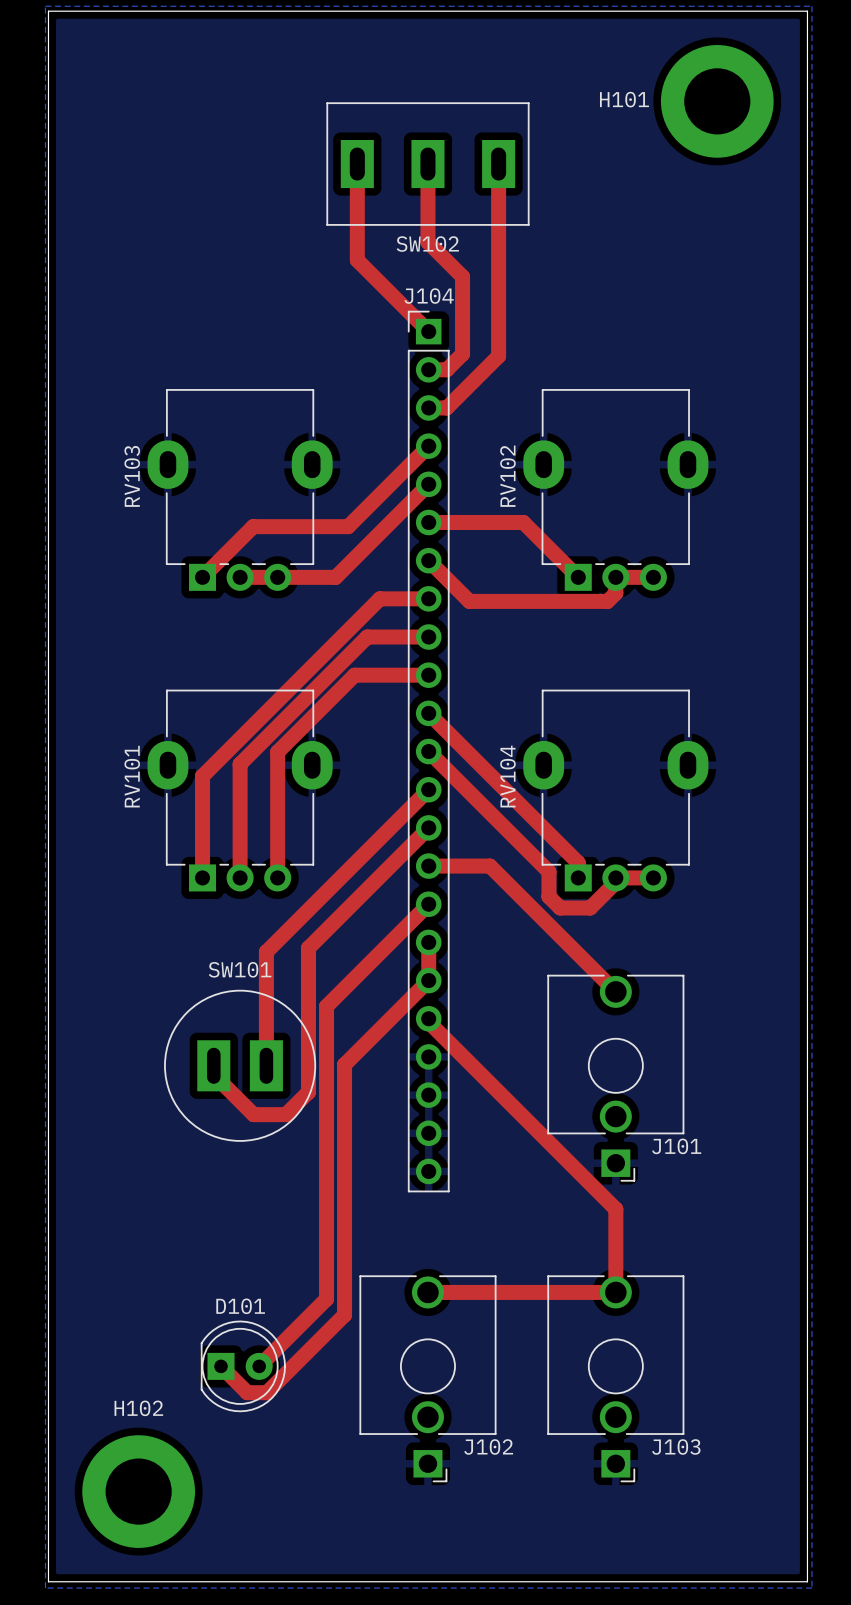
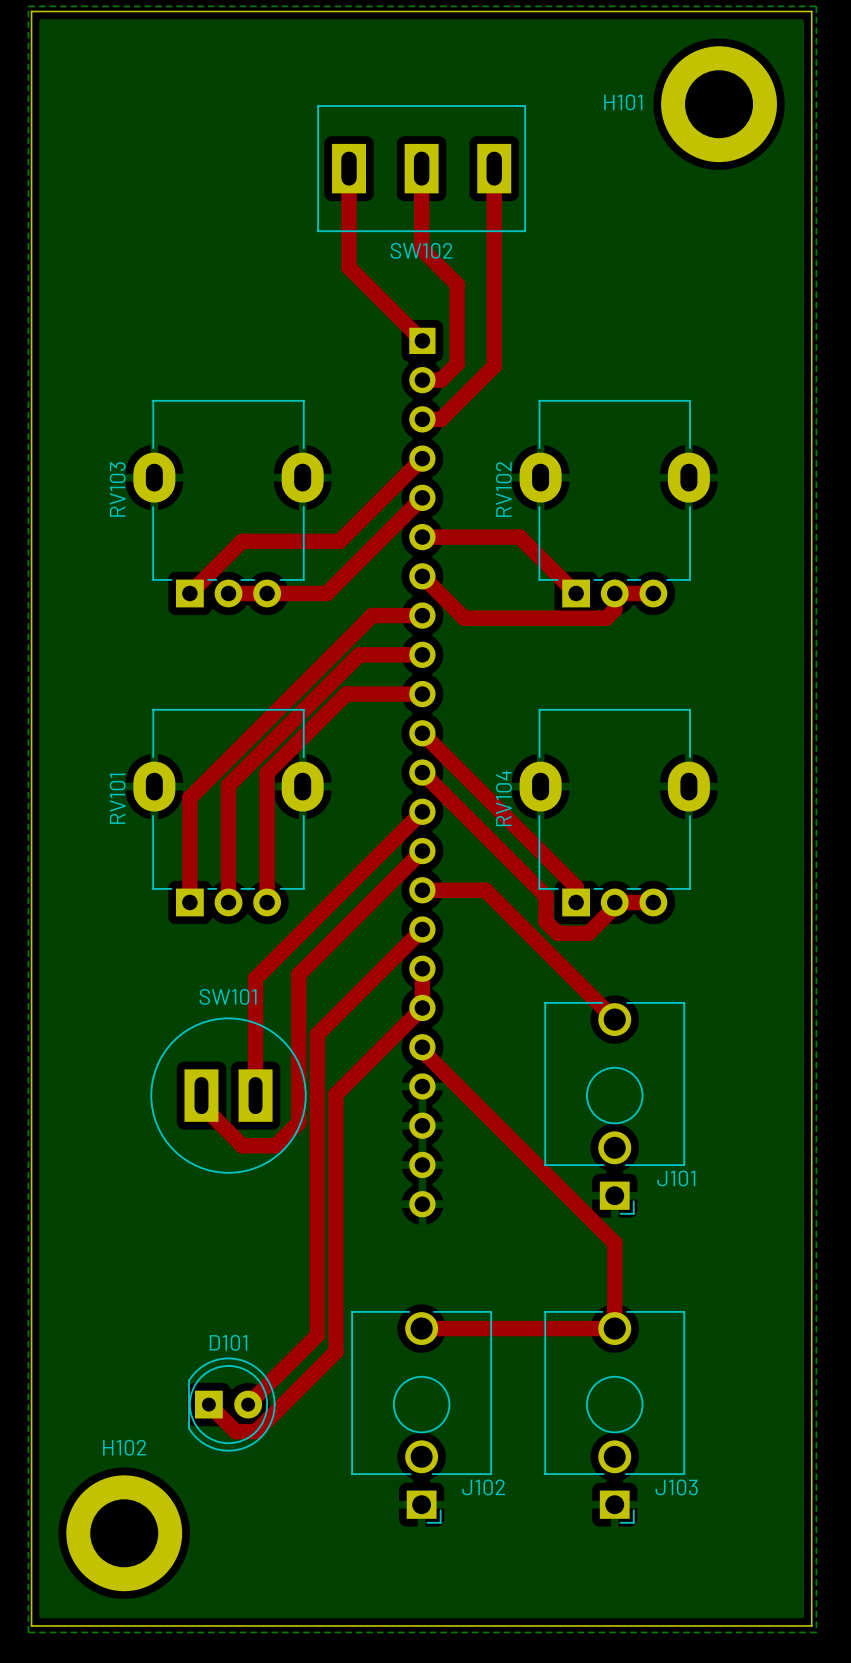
J104 side: top (428, 751) -> bottom (422, 772)

